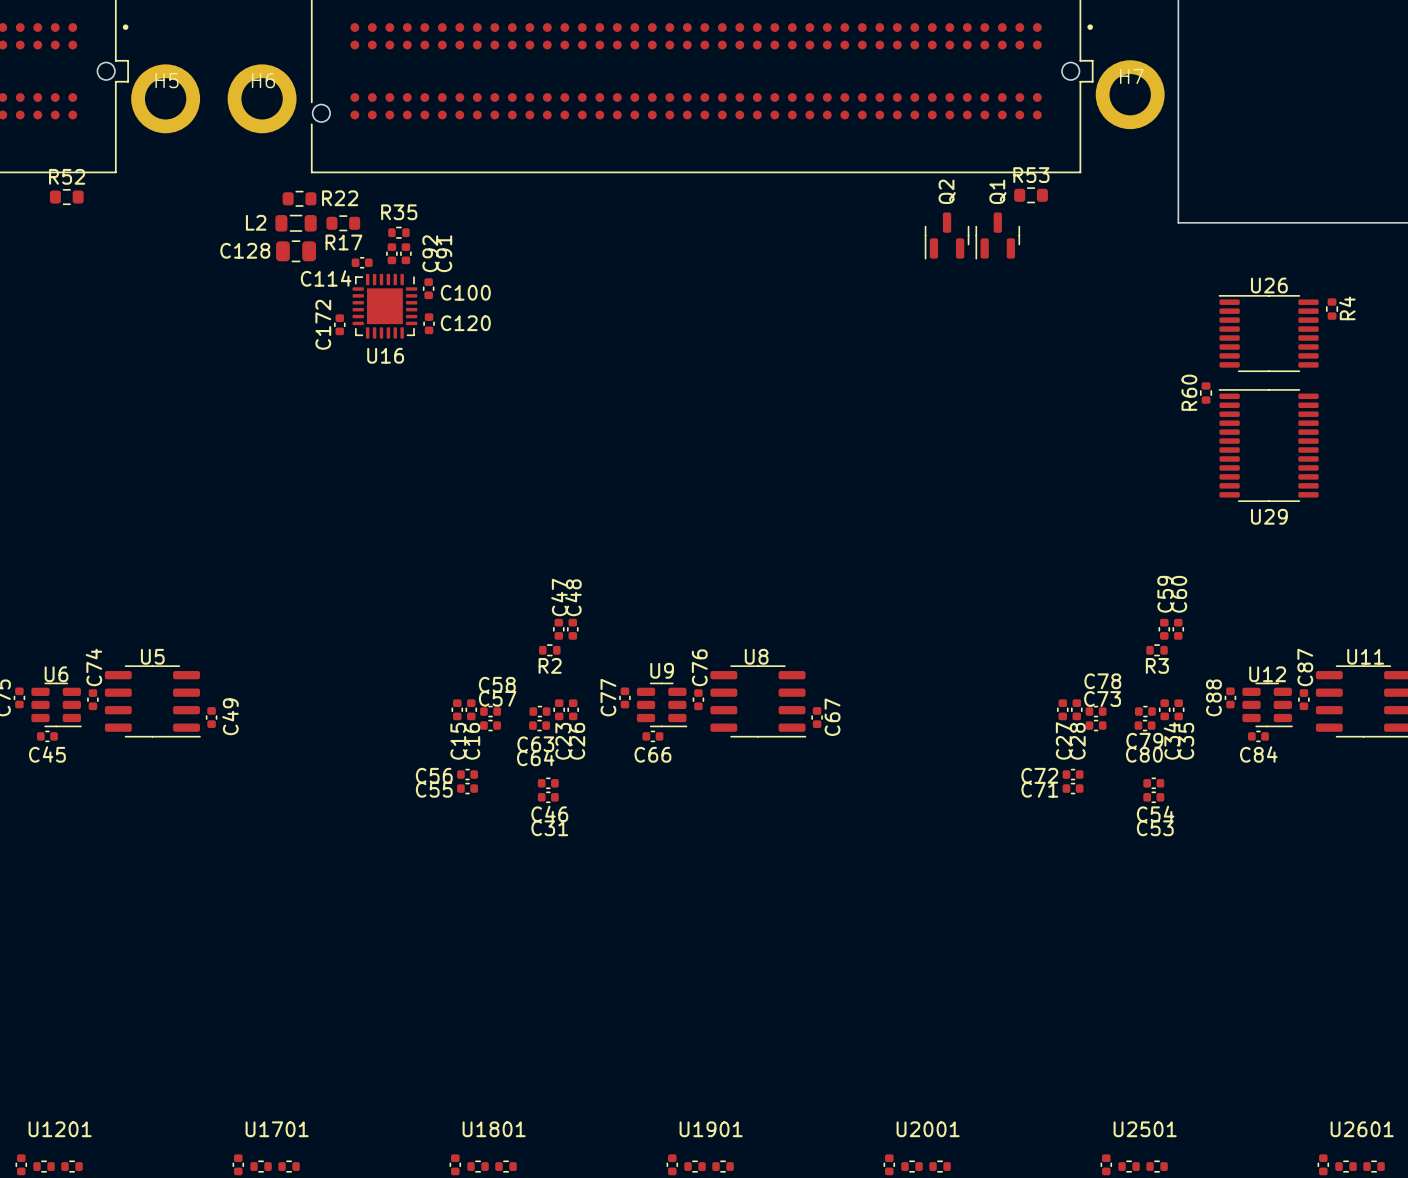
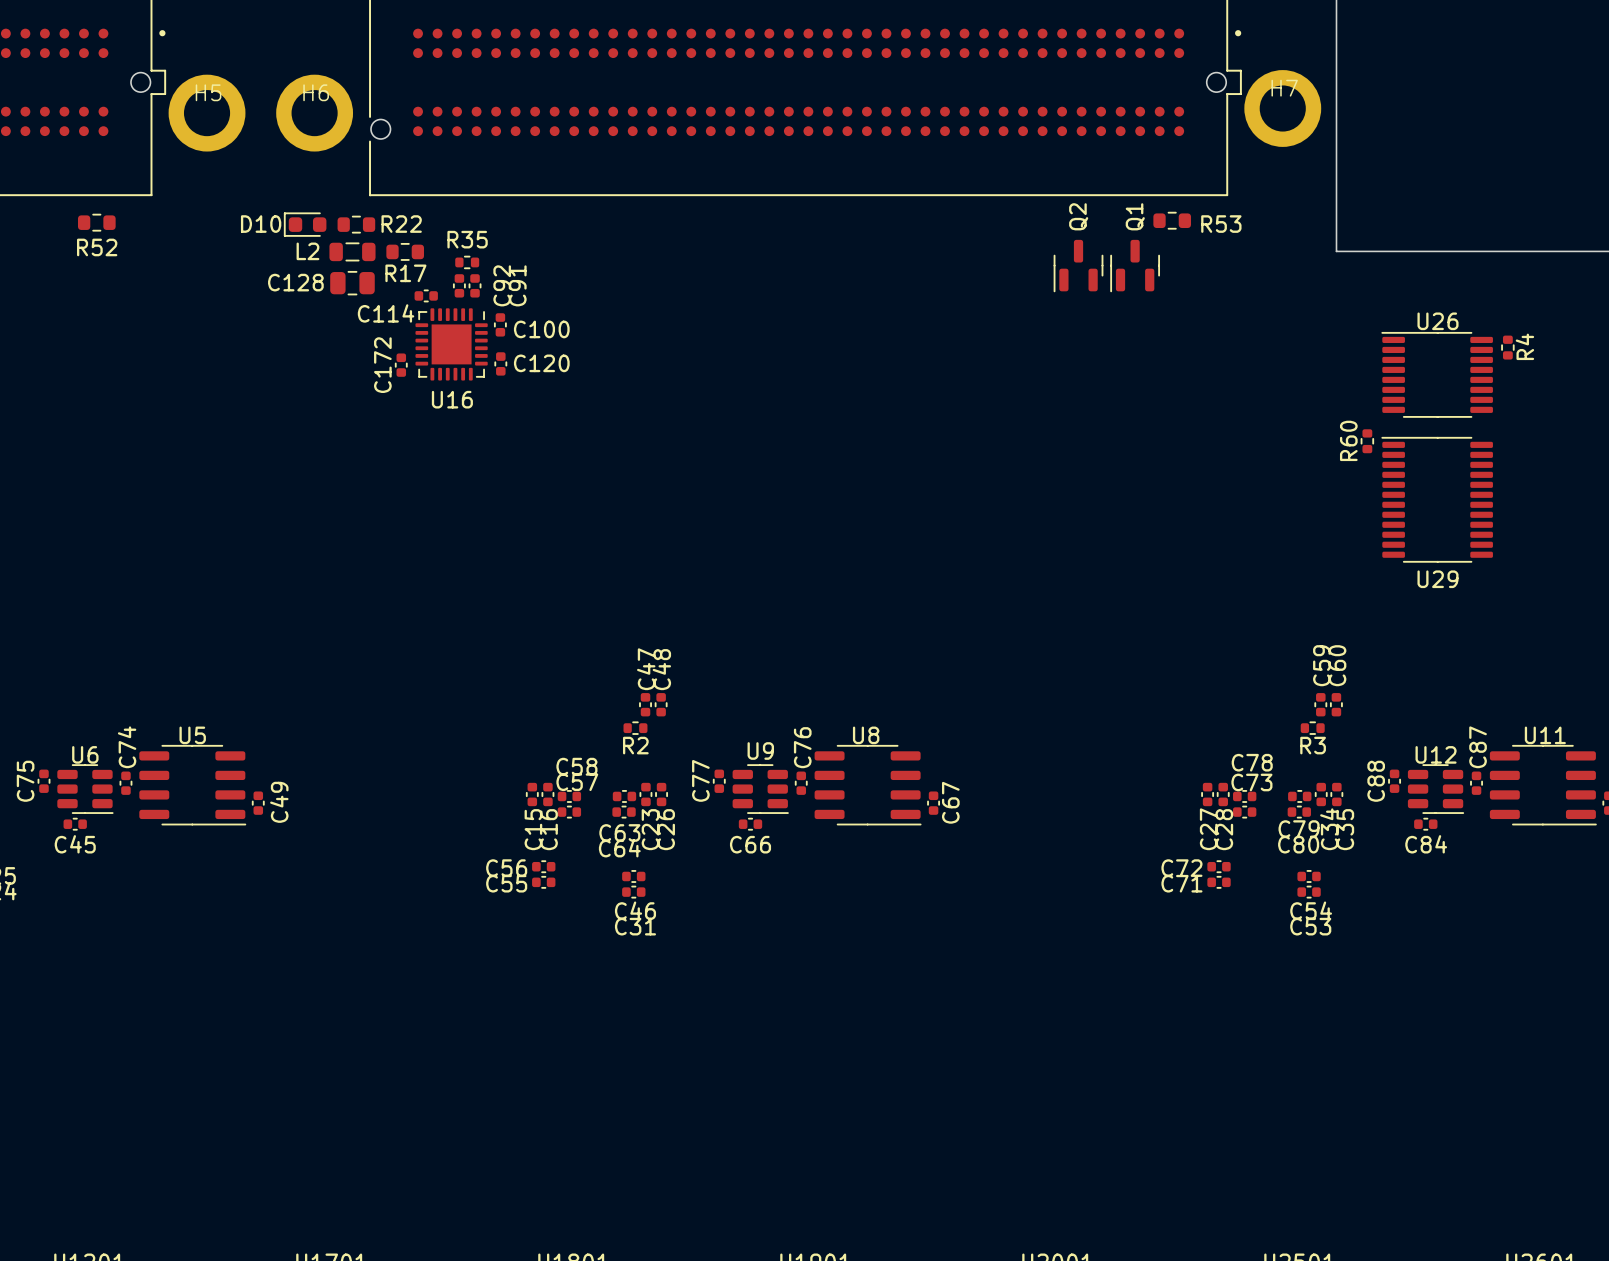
R53 name position: R53 (1031, 175) -> R53 (1221, 224)
R52 name position: R52 (67, 176) -> R52 (97, 247)
D10: none -> (305, 224)

